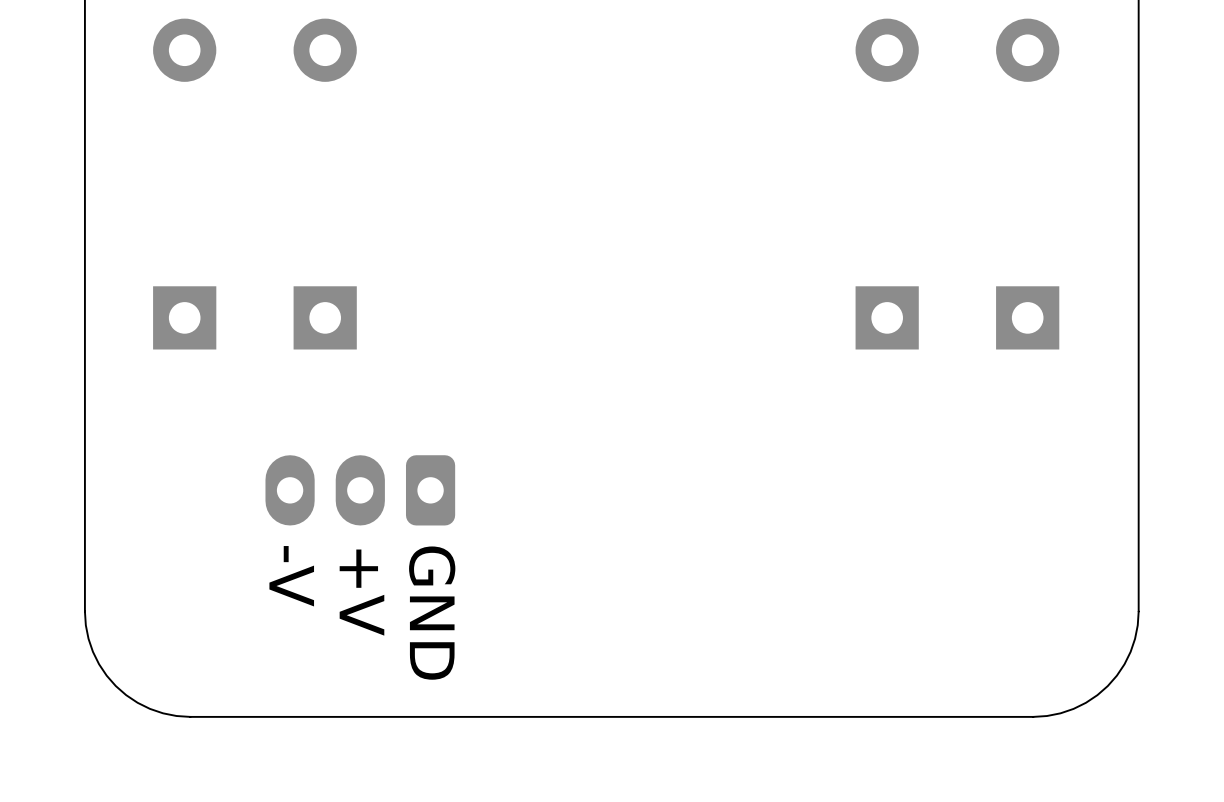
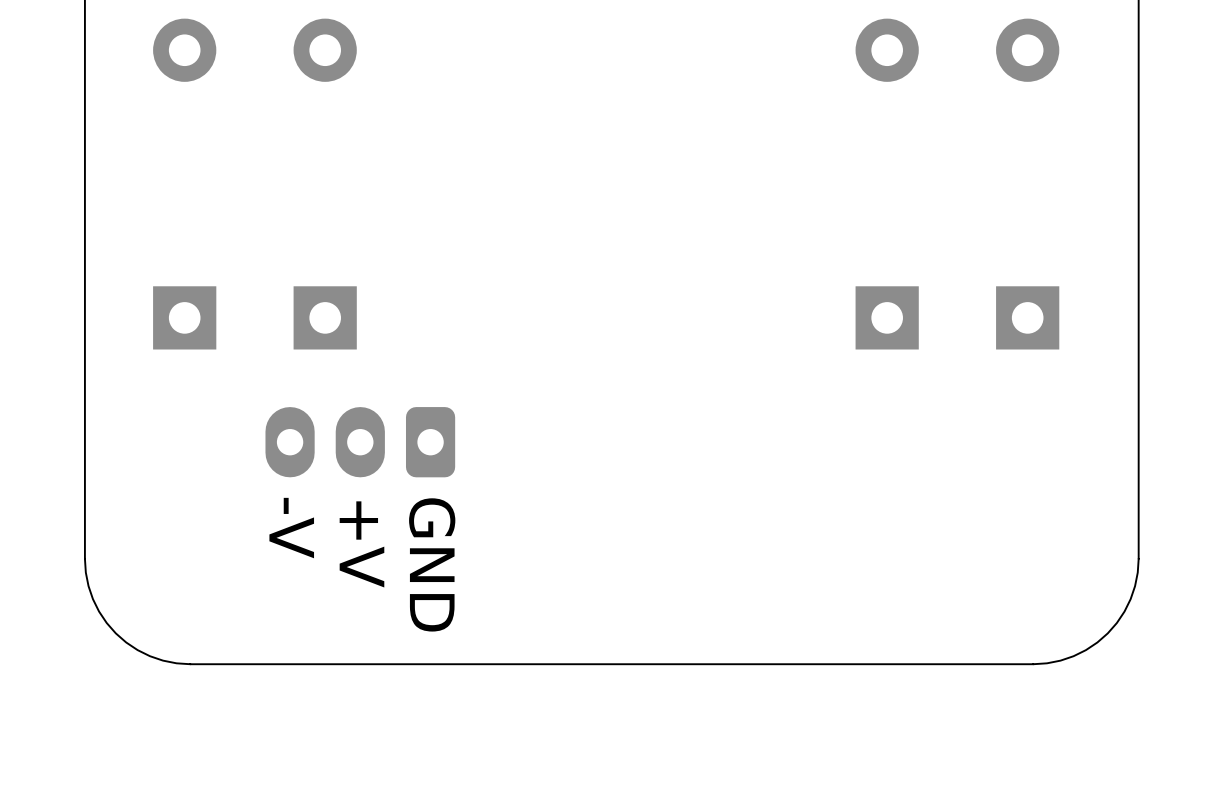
part position: (360, 490) -> (360, 442)
board edge: (1138, 558) (1137, 625) (1130, 651) (1124, 664) (1107, 686) (1085, 702) (1060, 713) (1033, 716) (176, 716) (163, 713) (137, 702) (115, 686) (99, 664) (92, 651) (85, 625) (84, 558) -> (1138, 558) (1137, 572) (1130, 599) (1116, 622) (1107, 633) (1085, 650) (1073, 656) (1060, 660) (1033, 664) (176, 663) (149, 656) (137, 650) (126, 642) (106, 622) (92, 599) (85, 572) (84, 558)

